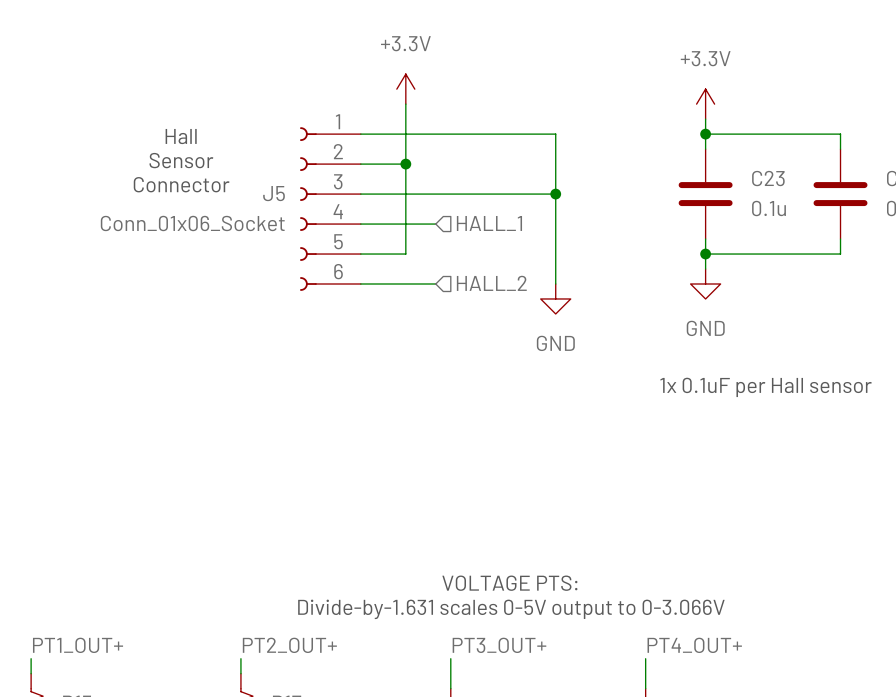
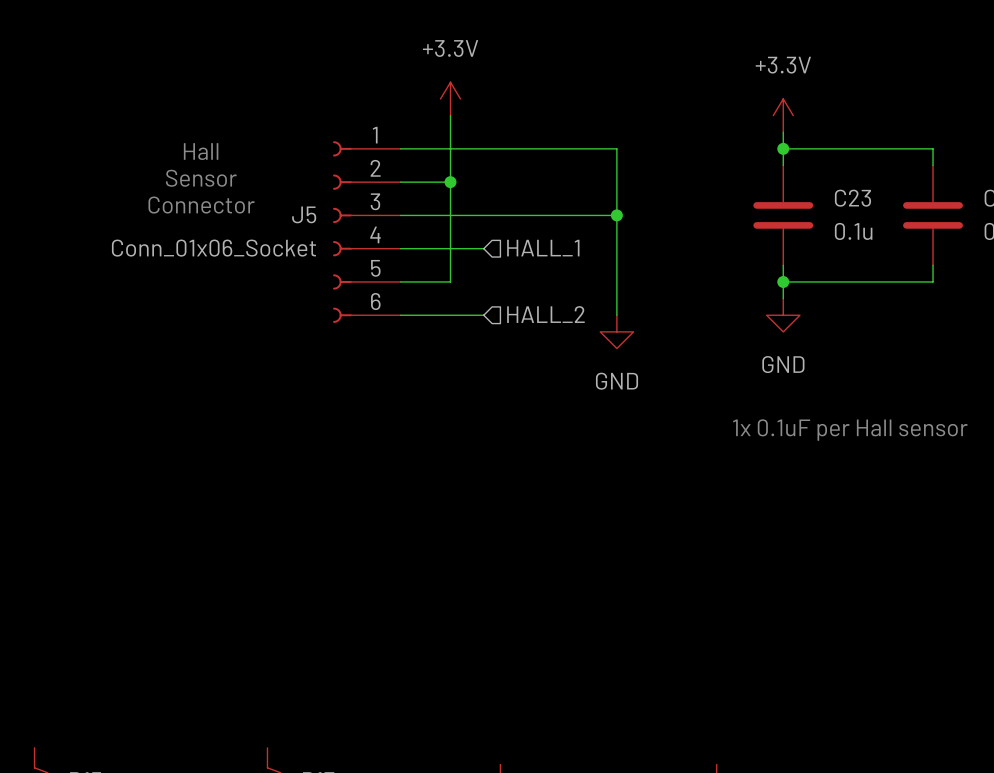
text: VOLTAGE PTS: (509, 583) -> none
text: Divide-by-1.631 scales 0-5V output to 0-3.066V (511, 609) -> none
label: PT1_OUT+ (78, 645) -> none
label: PT2_OUT+ (289, 645) -> none
label: PT3_OUT+ (499, 645) -> none
label: PT4_OUT+ (694, 645) -> none
wire: (31, 658) (31, 673) -> none
wire: (240, 658) (240, 673) -> none
wire: (450, 658) (450, 688) -> none
wire: (645, 658) (645, 688) -> none

